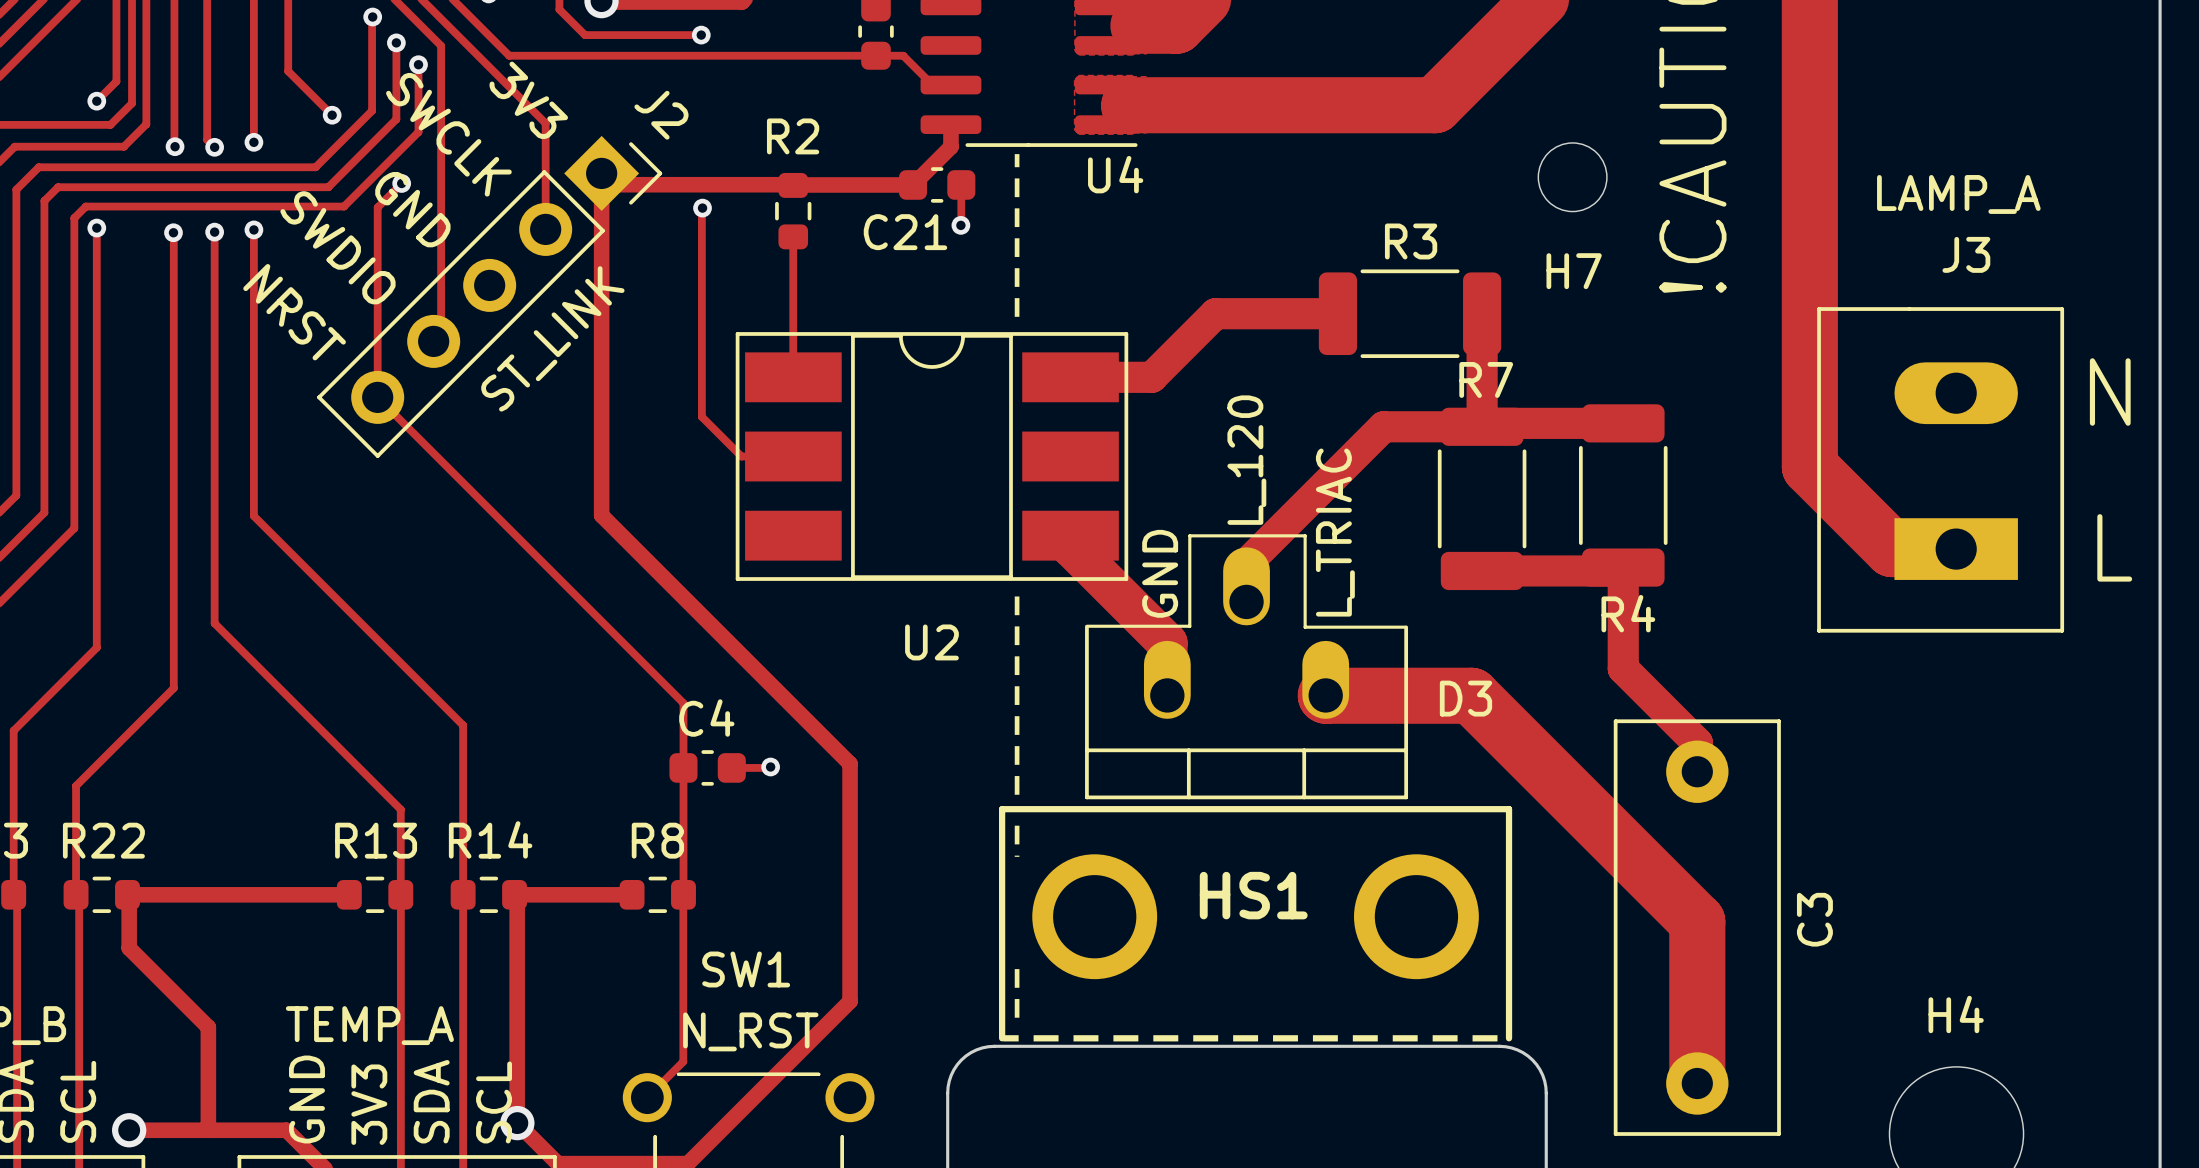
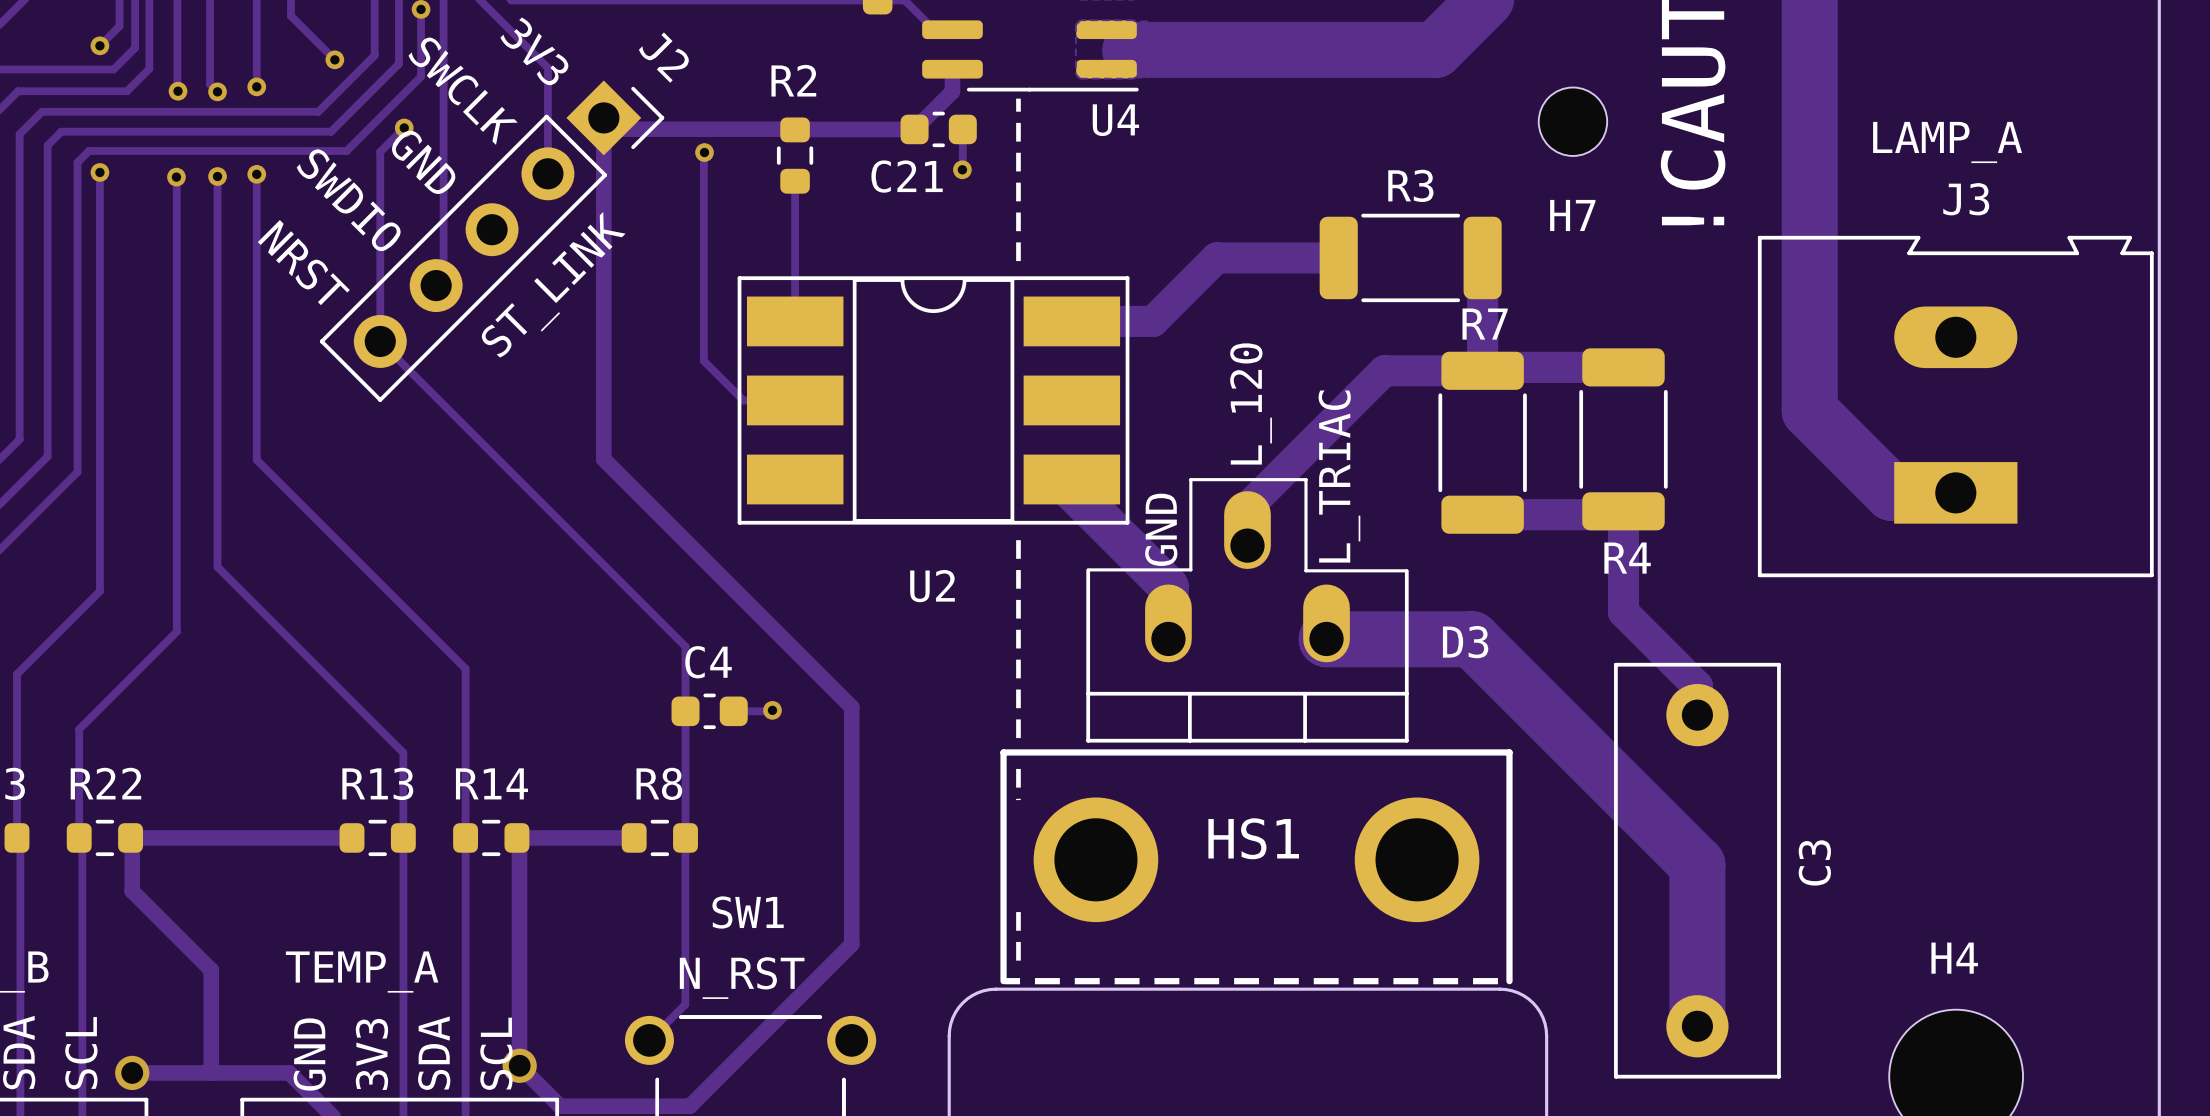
J3 footprint: [1817, 307, 2065, 633] -> [1757, 235, 2154, 578]
text: N (2110, 392) -> none
text: L (2114, 547) -> none

